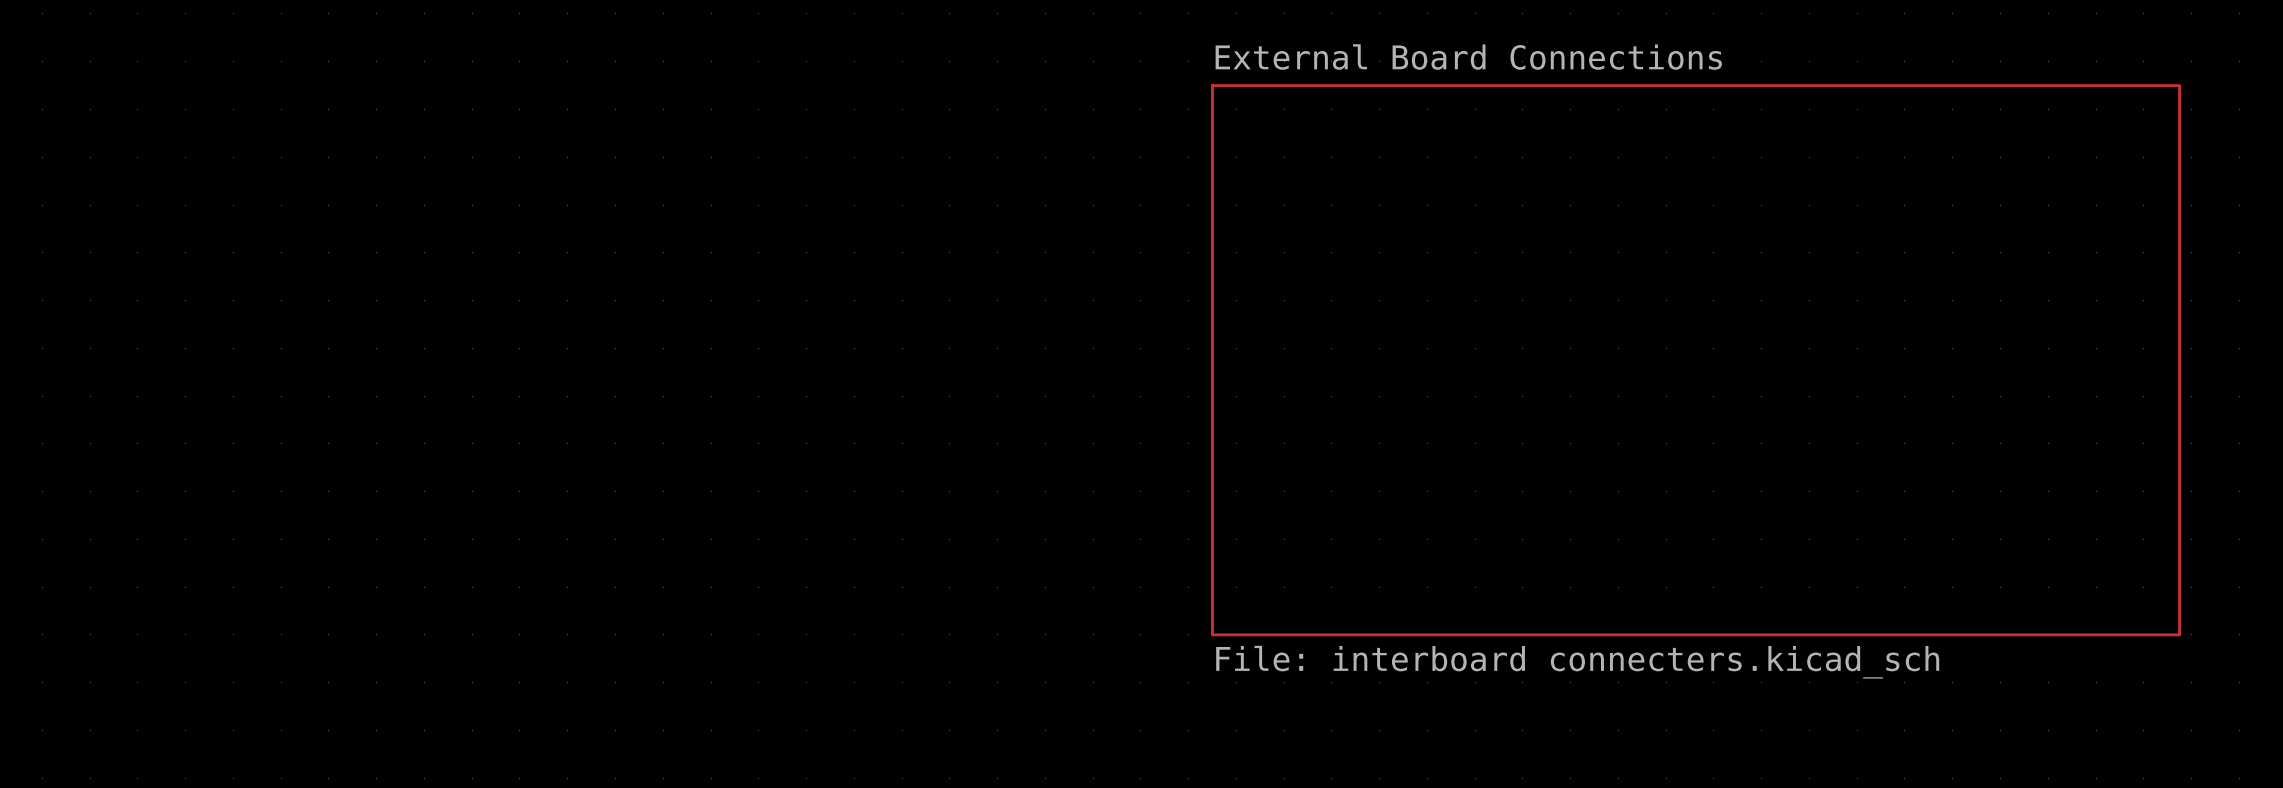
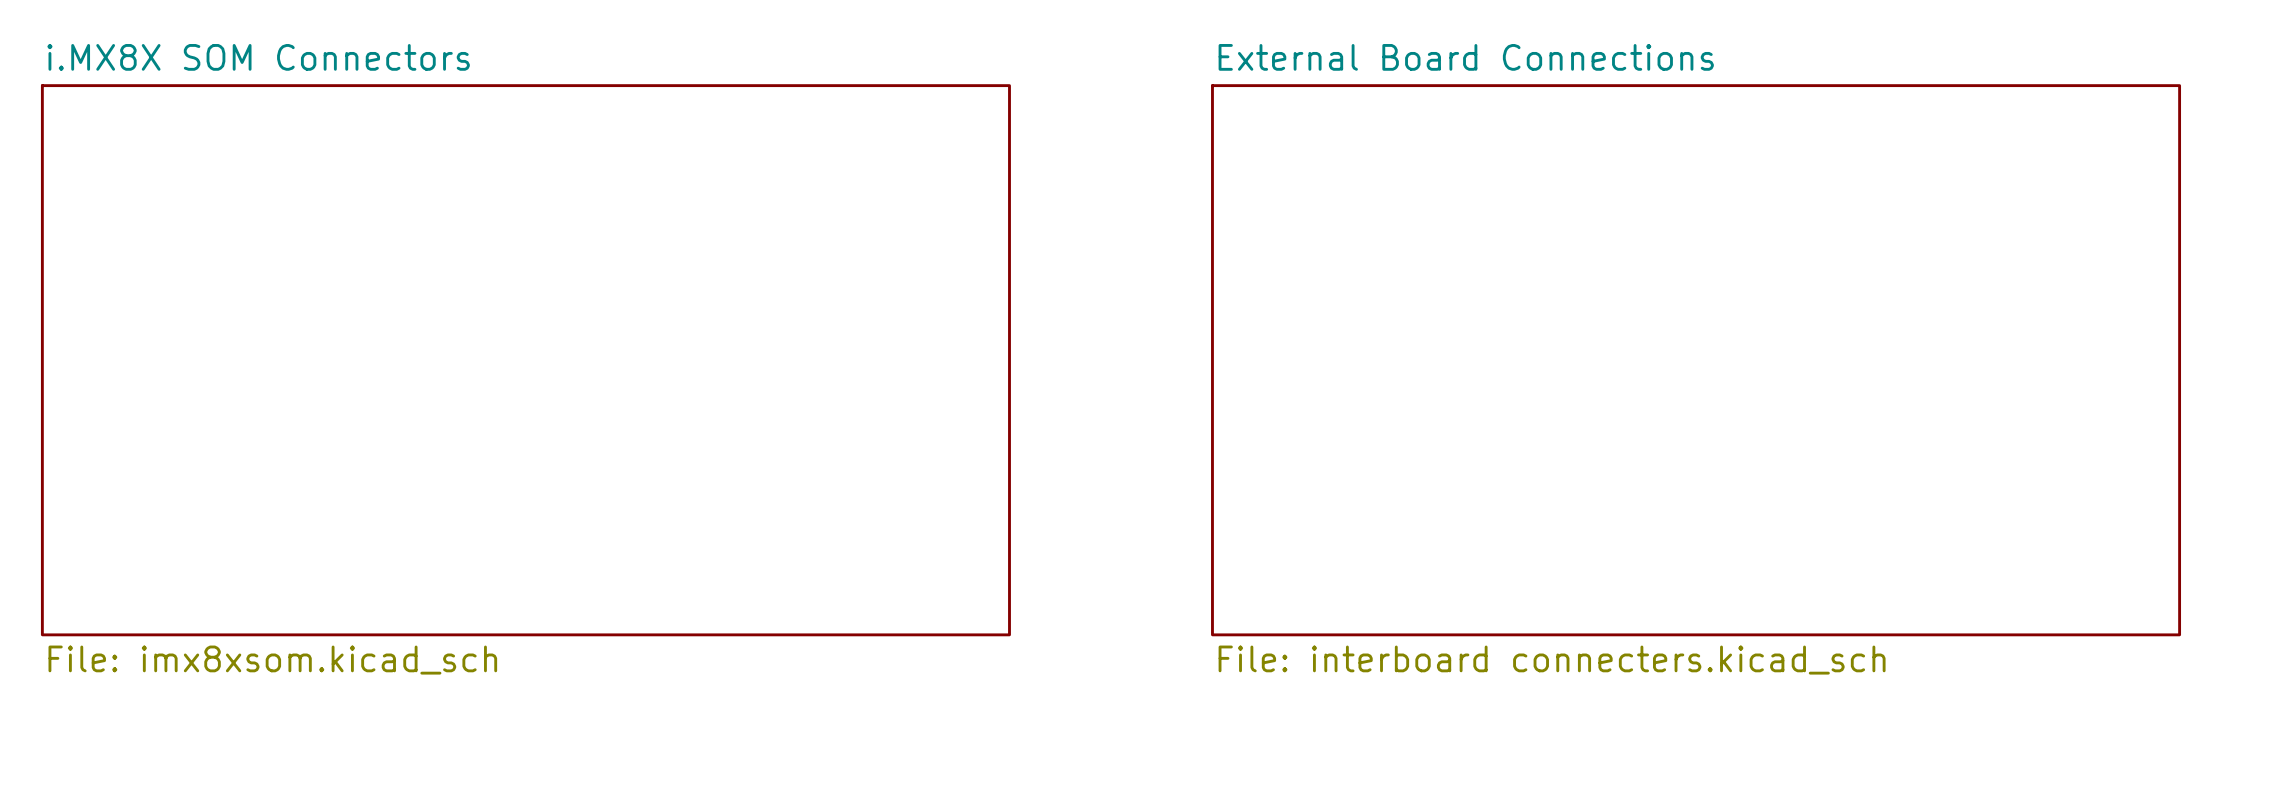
sheet i.MX8X SOM Connectors: none -> File: imx8xsom.kicad_sch (525, 360)

